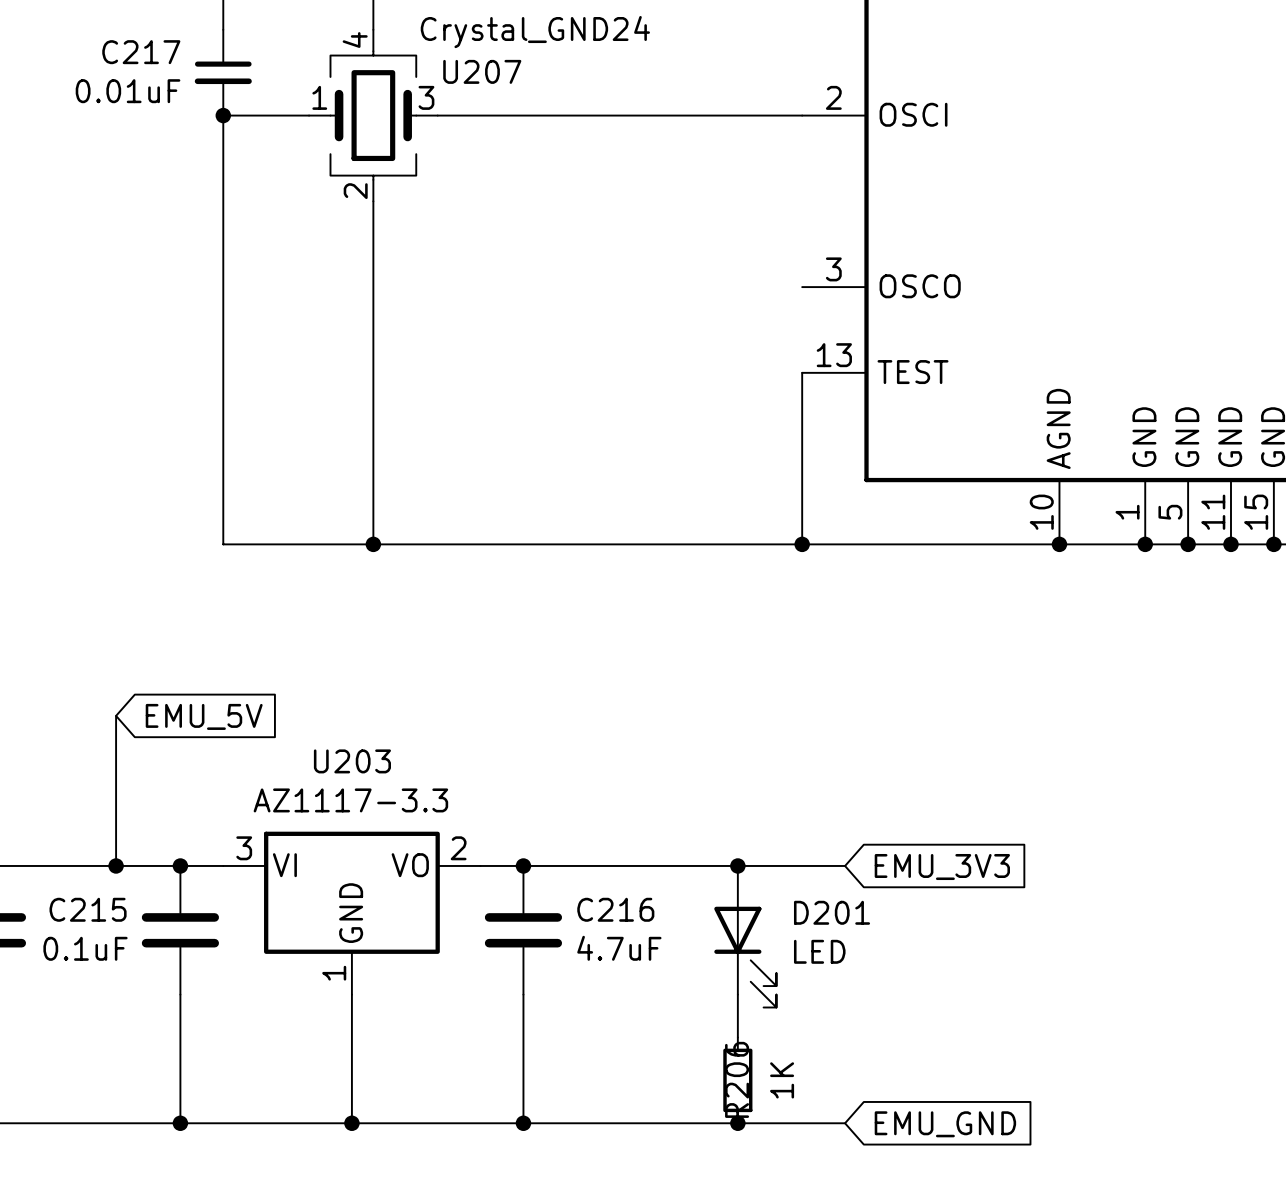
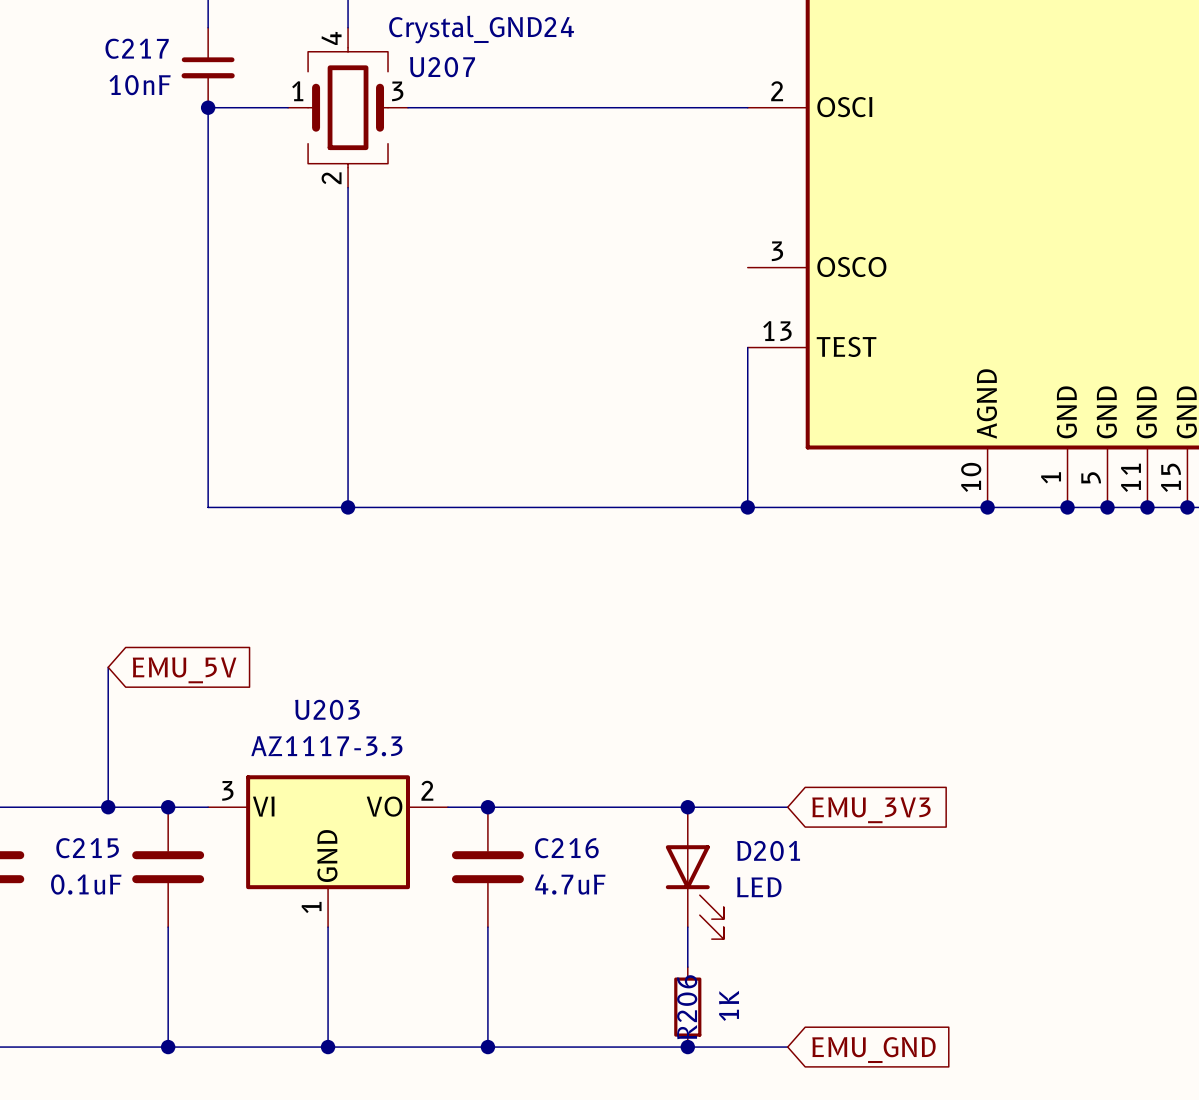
C217 value: 0.01uF (128, 91) -> 10nF (140, 85)

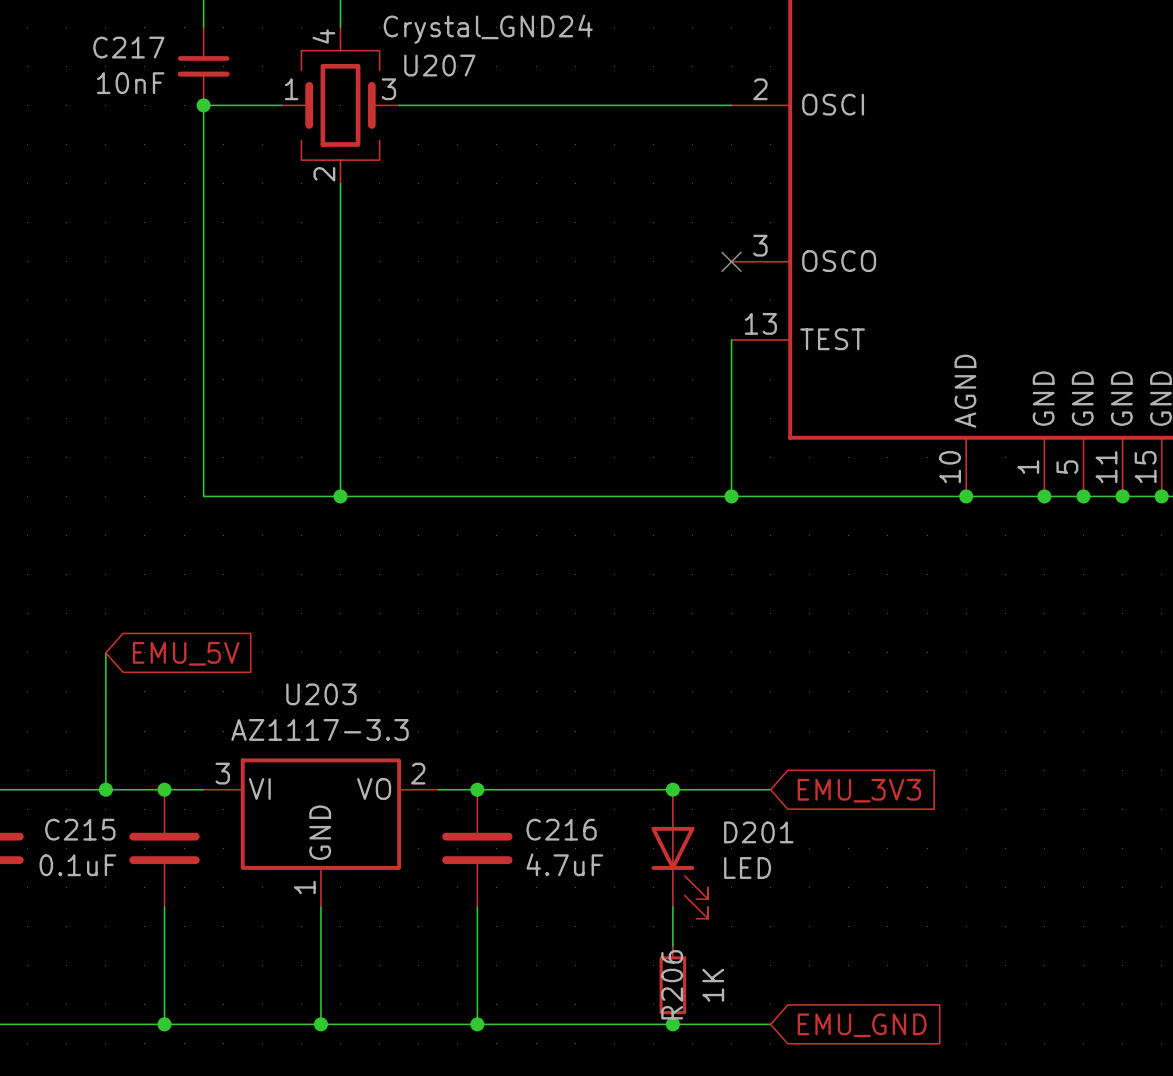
no-connect mark: none -> (731, 261)

